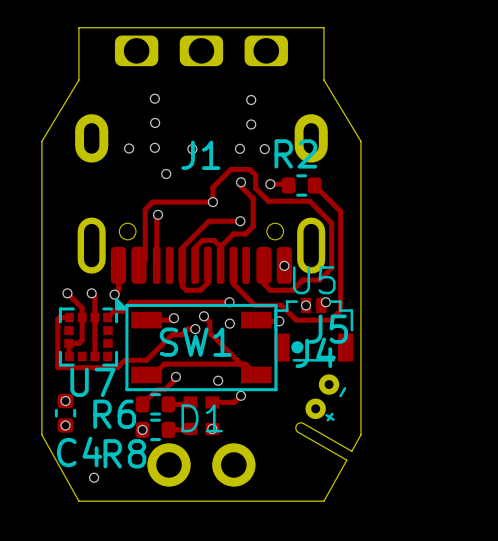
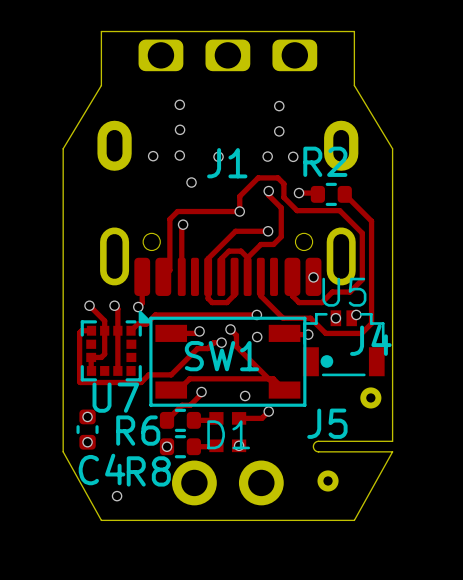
J5 position: (329, 384) -> (328, 480)
line: (345, 388) (340, 396) -> none
J4 position: (315, 408) -> (370, 397)
line: (332, 413) (327, 420) -> none
line: (326, 415) (333, 419) -> none
board edge: (360, 424) (360, 434) -> (392, 441) (318, 441) (313, 446) (318, 451) (392, 451)
board edge: (351, 451) (302, 423) (296, 425) (297, 432) (346, 460) -> (383, 468) (378, 478)

